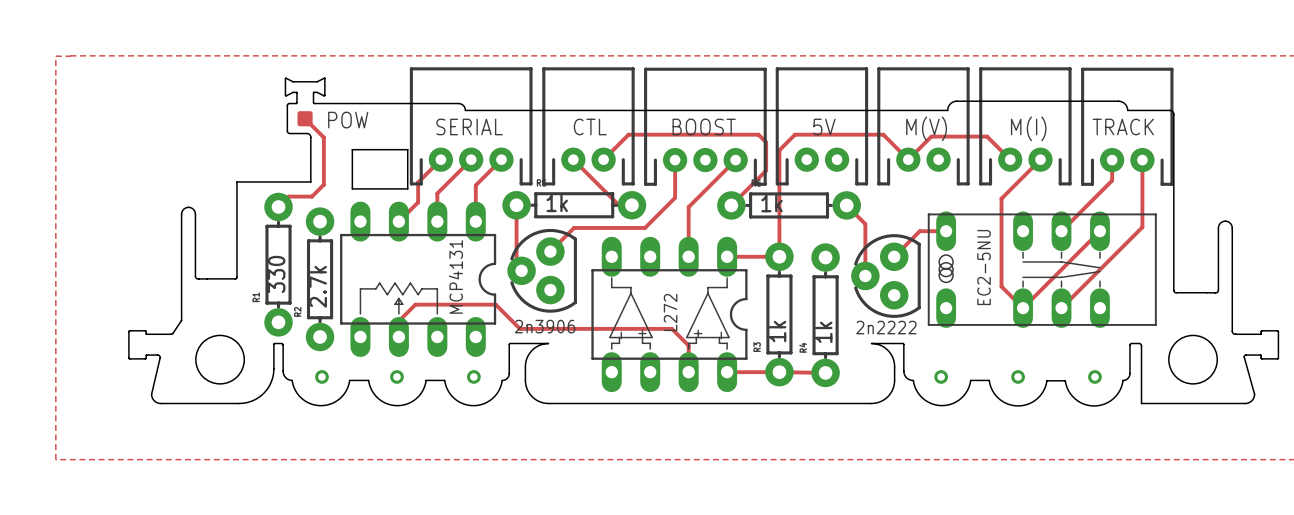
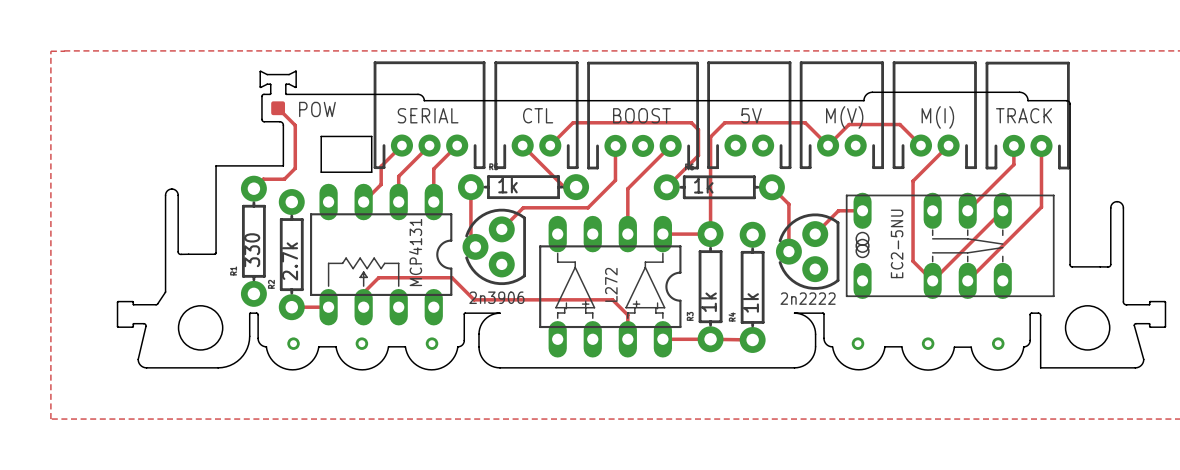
track: none -> (291, 307) (328, 307)

